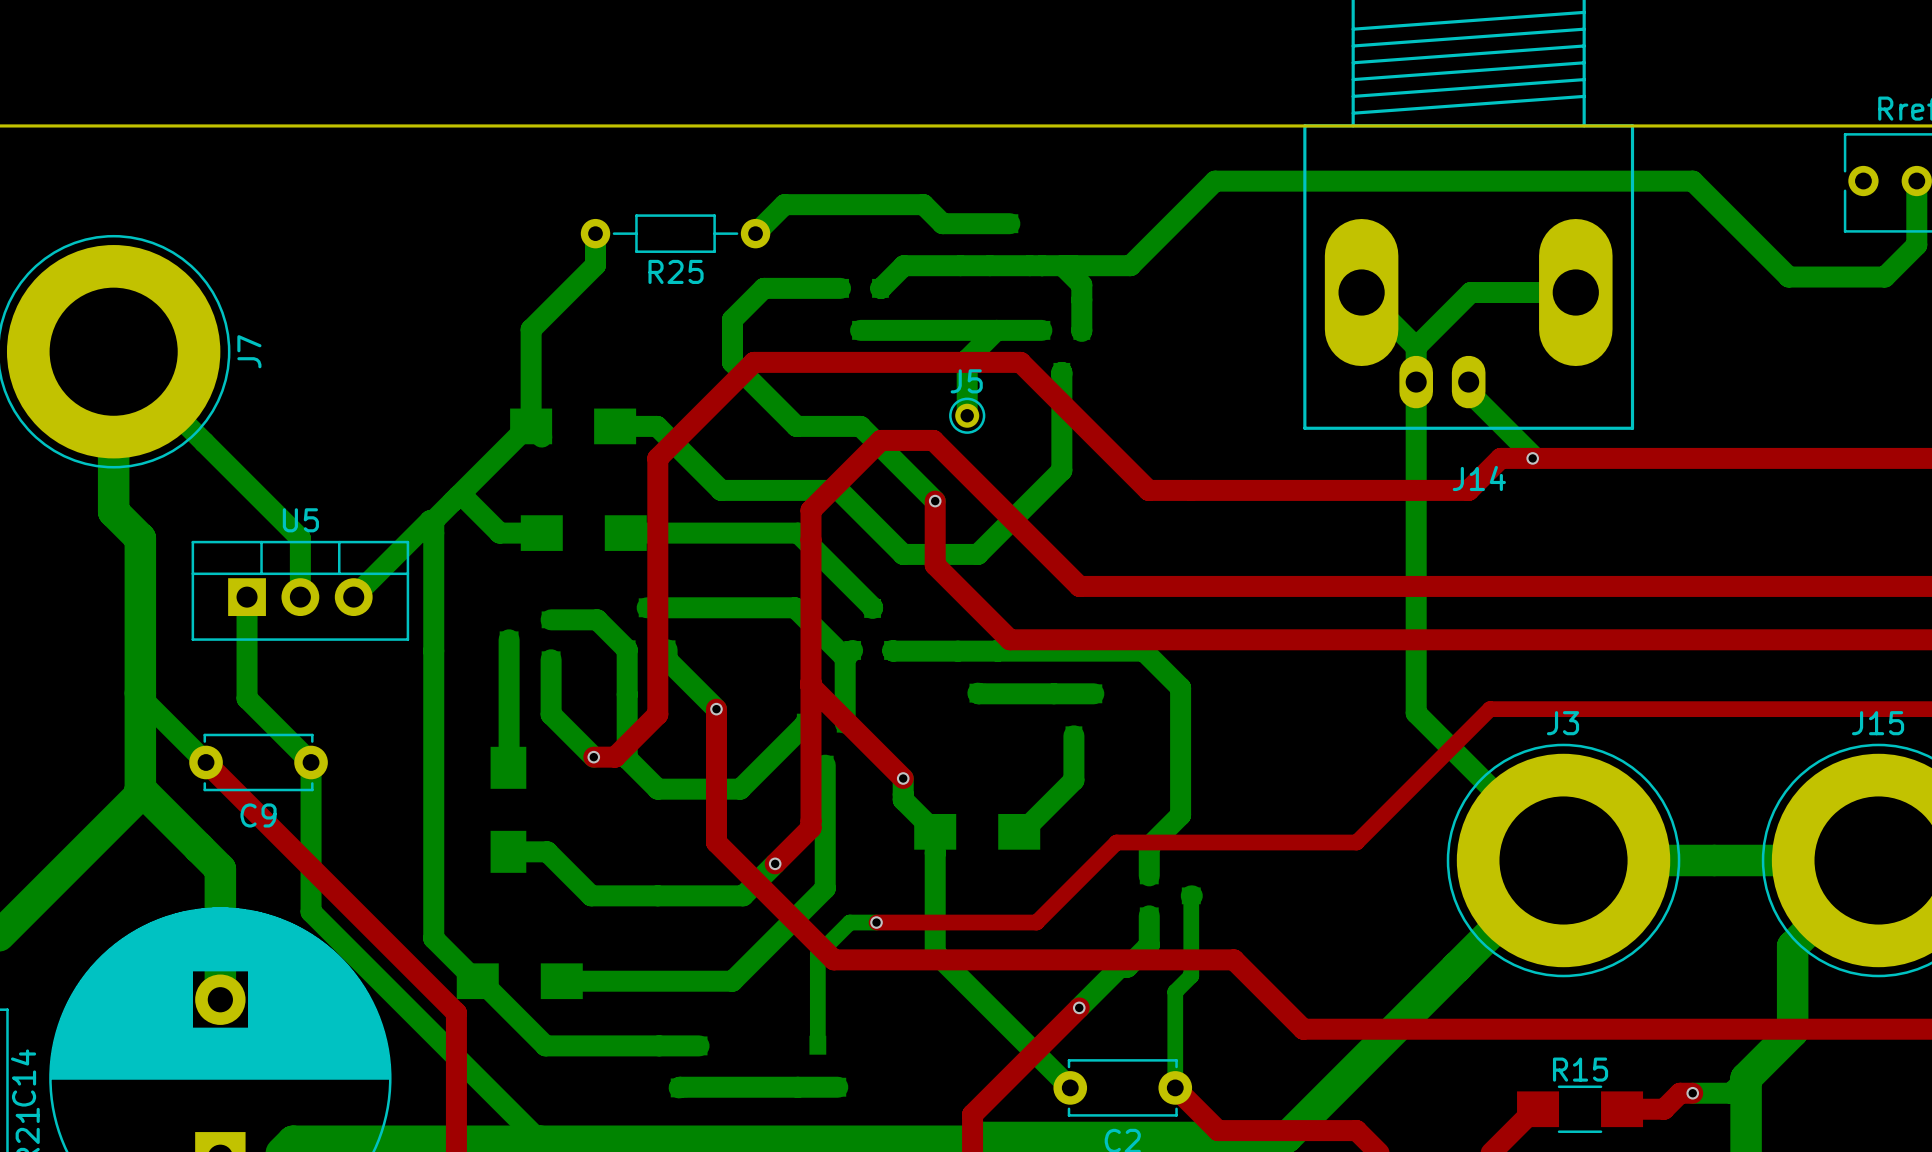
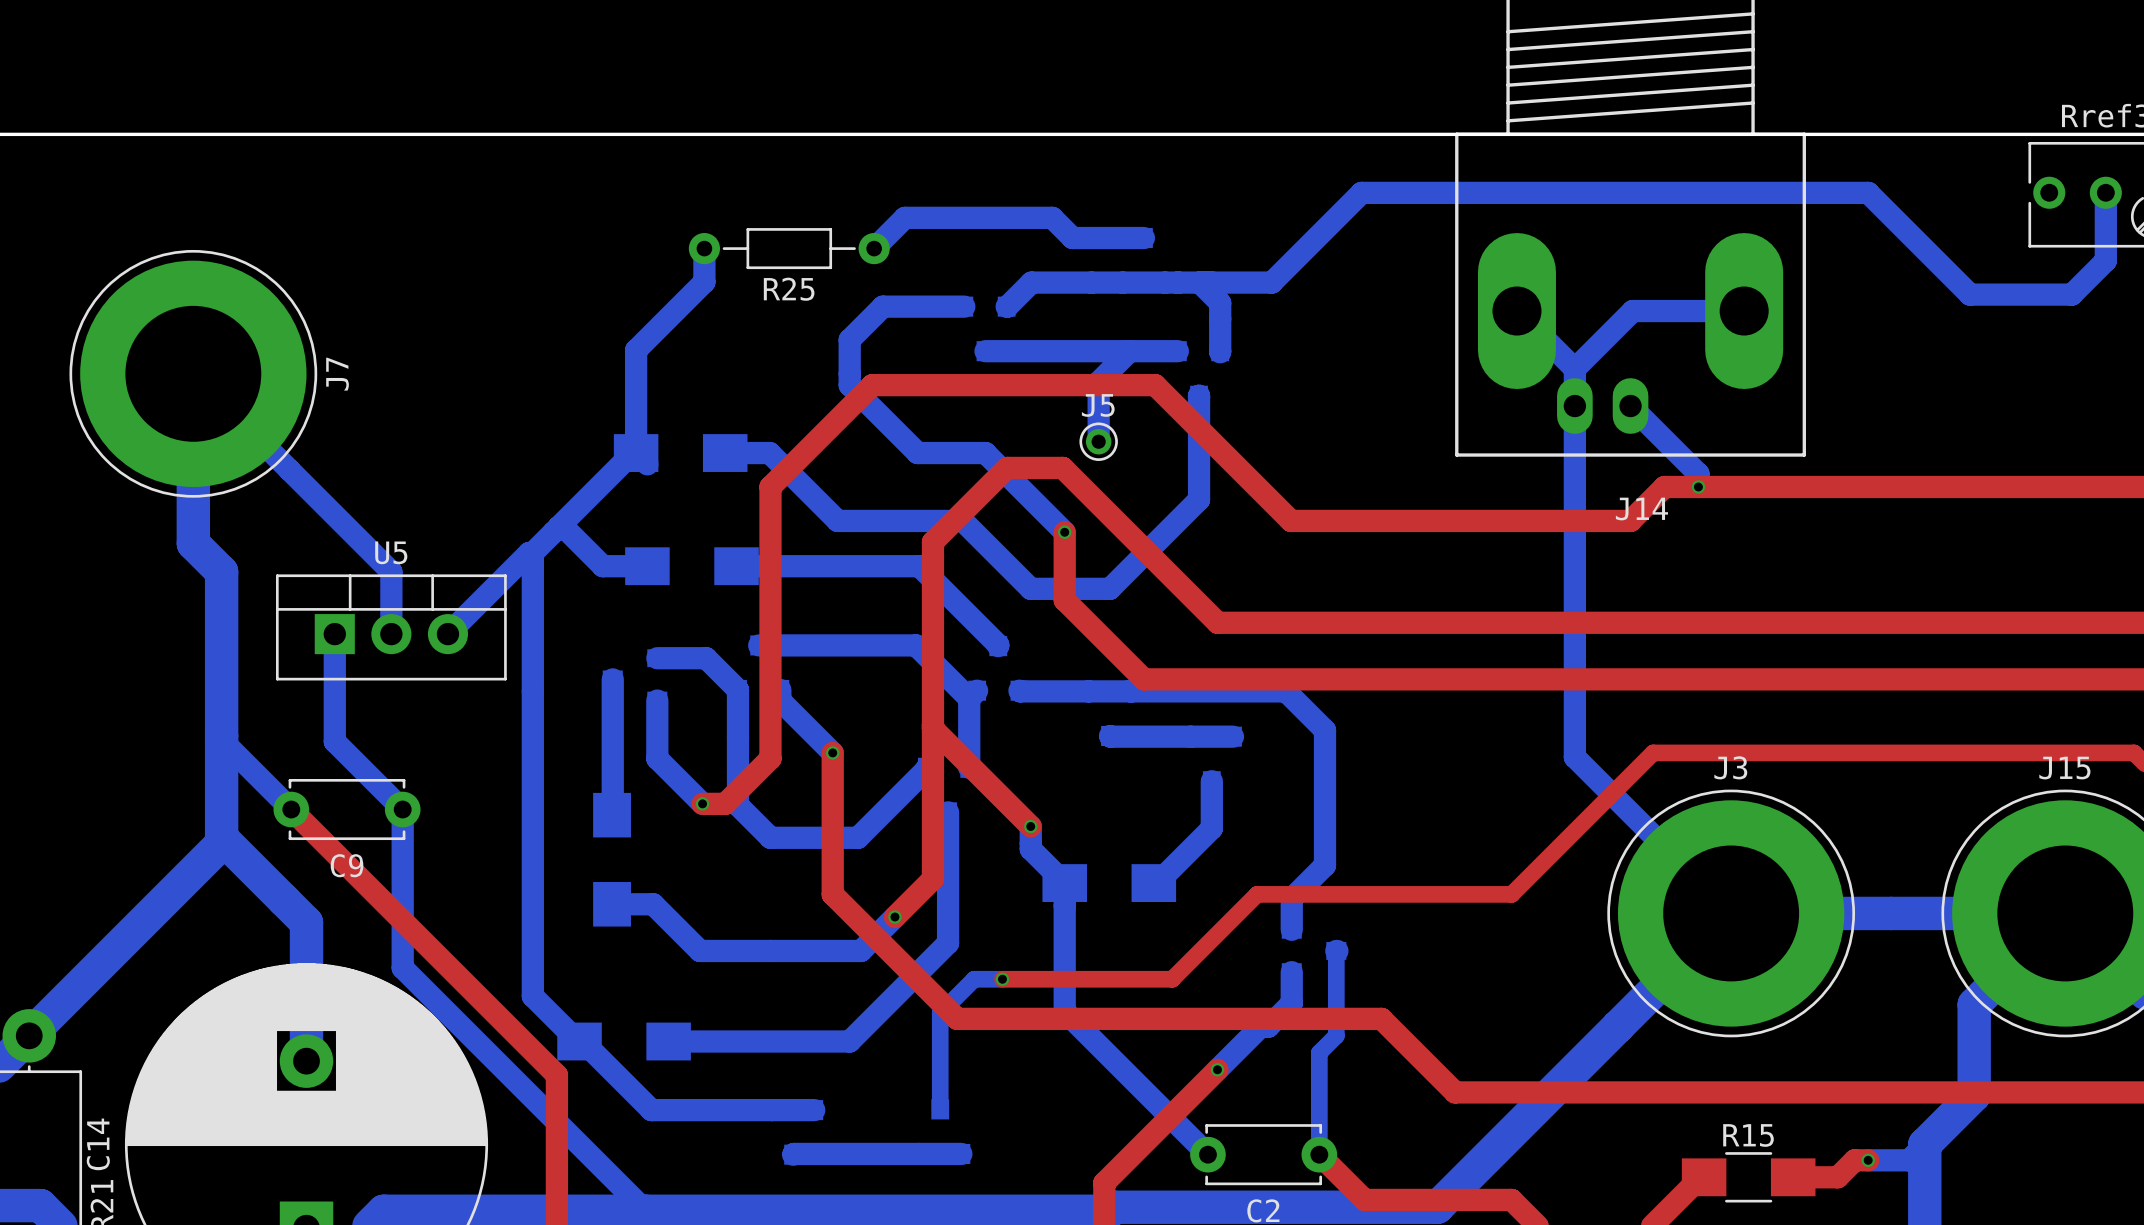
bottom track: none -> (1630, 406) (1698, 473) (1698, 486)
bottom track: (1468, 391) (1535, 458) -> none

